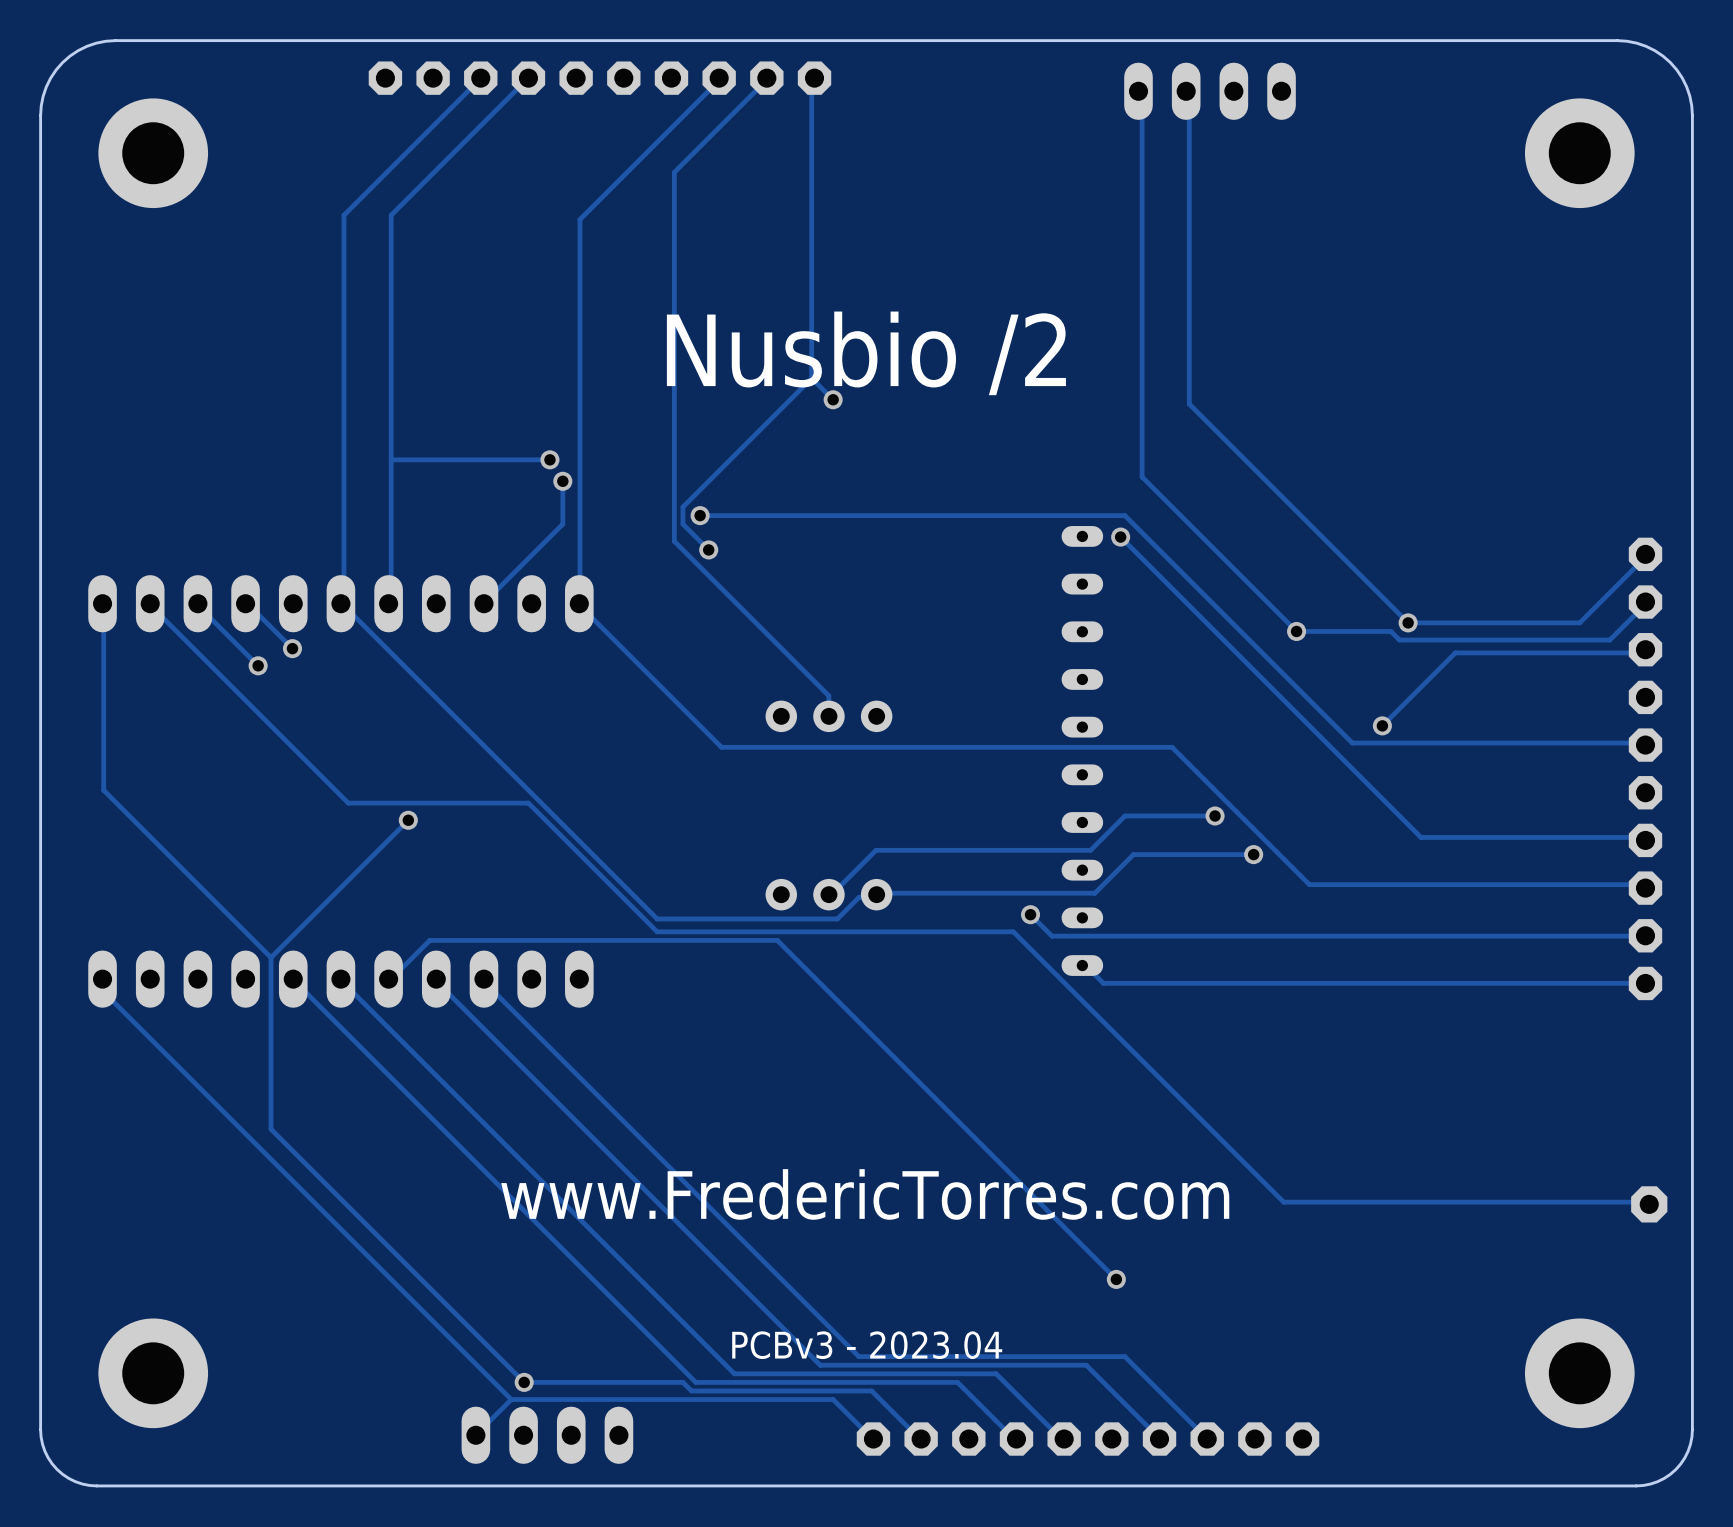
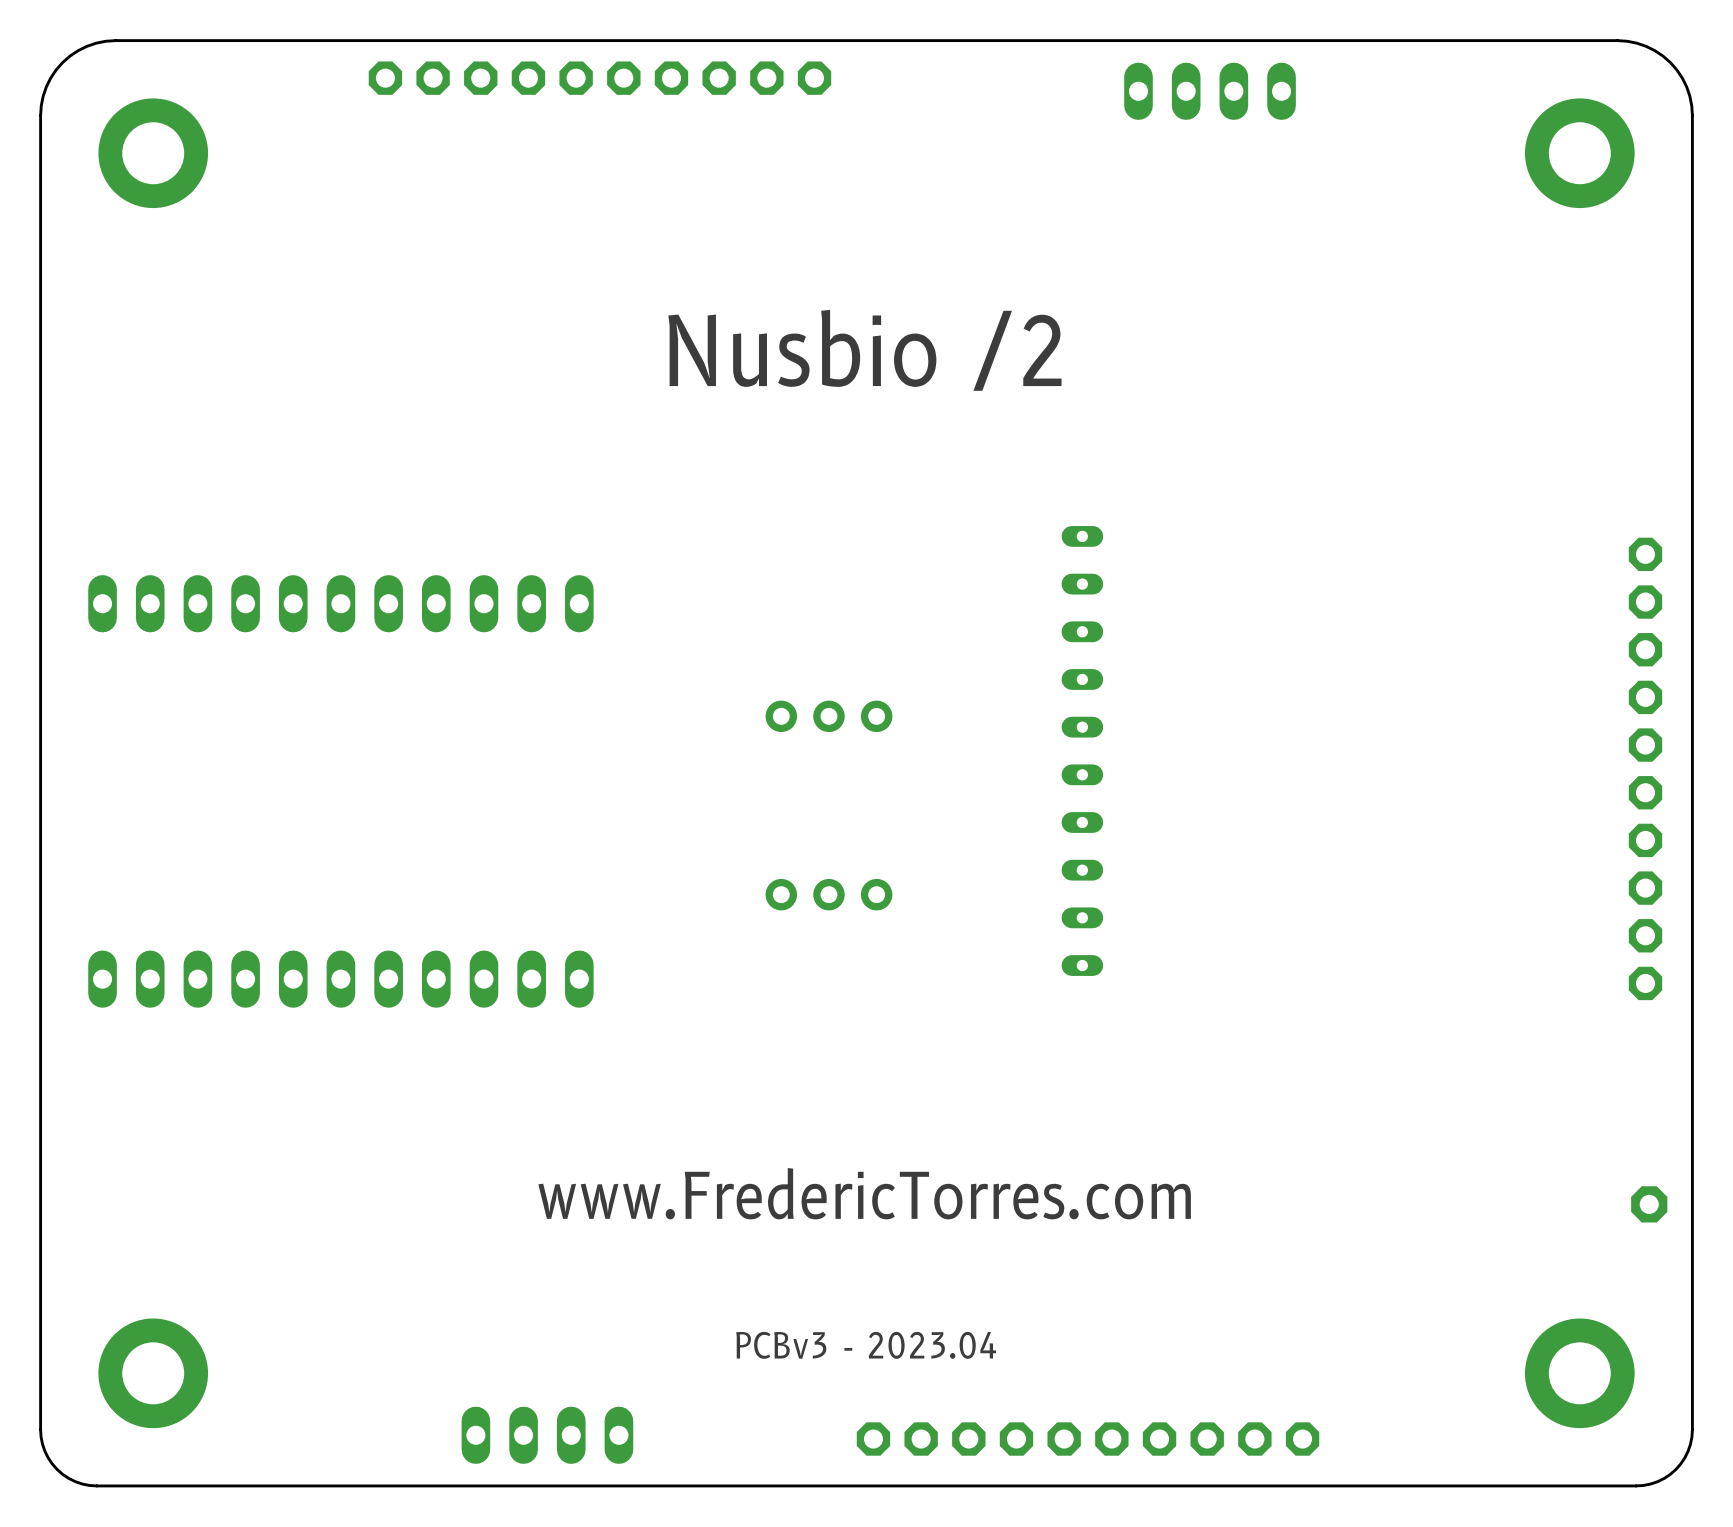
track: (480, 78) (343, 215) (343, 601) (340, 603) (657, 918) (837, 918) (858, 897) (876, 897) (876, 894) (880, 893) (1094, 893) (1133, 854) (1253, 854) -> none
track: (528, 78) (391, 215) (391, 601) (388, 603) -> none
track: (719, 78) (717, 82) (579, 219) (579, 603) (721, 747) (1172, 747) (1309, 884) (1644, 884) (1645, 888) -> none
track: (766, 78) (674, 172) (674, 541) (828, 695) (828, 716) -> none
track: (814, 78) (811, 82) (811, 378) -> none
track: (1138, 91) (1142, 95) (1142, 477) (1296, 631) (1390, 631) (1399, 640) (1609, 640) (1644, 605) (1645, 602) -> none
track: (1186, 91) (1189, 95) (1189, 404) (1408, 622) (1579, 622) (1644, 558) (1645, 554) -> none
track: (811, 378) (682, 507) (682, 524) (708, 549) -> none
track: (811, 378) (833, 399) -> none
via: (833, 399) -> none
track: (549, 459) (391, 459) -> none
via: (549, 459) -> none
track: (562, 481) (562, 524) (483, 603) -> none
via: (562, 481) -> none
track: (700, 515) (1124, 515) (1352, 743) (1644, 743) (1645, 745) -> none
via: (700, 515) -> none
track: (1120, 537) (1421, 837) (1644, 837) (1645, 840) -> none
via: (1120, 537) -> none
via: (708, 549) -> none
track: (102, 603) (103, 790) (271, 957) -> none
track: (150, 603) (348, 803) (528, 803) (657, 931) (1013, 931) (1283, 1202) (1648, 1202) (1649, 1204) -> none
track: (197, 603) (258, 665) -> none
track: (245, 603) (292, 648) -> none
via: (1408, 622) -> none
via: (1296, 631) -> none
via: (292, 648) -> none
track: (1645, 649) (1644, 652) (1455, 652) (1382, 725) -> none
via: (258, 665) -> none
via: (1382, 725) -> none
track: (1215, 815) (1124, 815) (1090, 850) (876, 850) (833, 893) (828, 894) -> none
via: (1215, 815) -> none
track: (408, 820) (271, 957) -> none
via: (408, 820) -> none
via: (1253, 854) -> none
track: (1030, 914) (1051, 936) (1645, 935) -> none
via: (1030, 914) -> none
track: (271, 957) (271, 1129) (524, 1382) (682, 1382) (691, 1390) (871, 1390) (921, 1439) -> none
track: (1082, 965) (1086, 966) (1103, 983) (1645, 983) -> none
track: (102, 979) (103, 991) (511, 1399) -> none
track: (293, 979) (695, 1382) (957, 1382) (1013, 1438) (1016, 1439) -> none
track: (340, 979) (734, 1373) (996, 1373) (1060, 1438) (1064, 1439) -> none
track: (388, 979) (391, 979) (429, 940) (777, 940) (1116, 1279) -> none
track: (436, 979) (820, 1365) (1086, 1365) (1159, 1439) -> none
track: (483, 979) (485, 983) (858, 1356) (1124, 1356) (1207, 1439) -> none
via: (1116, 1279) -> none
via: (524, 1382) -> none
track: (511, 1399) (475, 1435) -> none
track: (511, 1399) (833, 1399) (873, 1439) -> none

